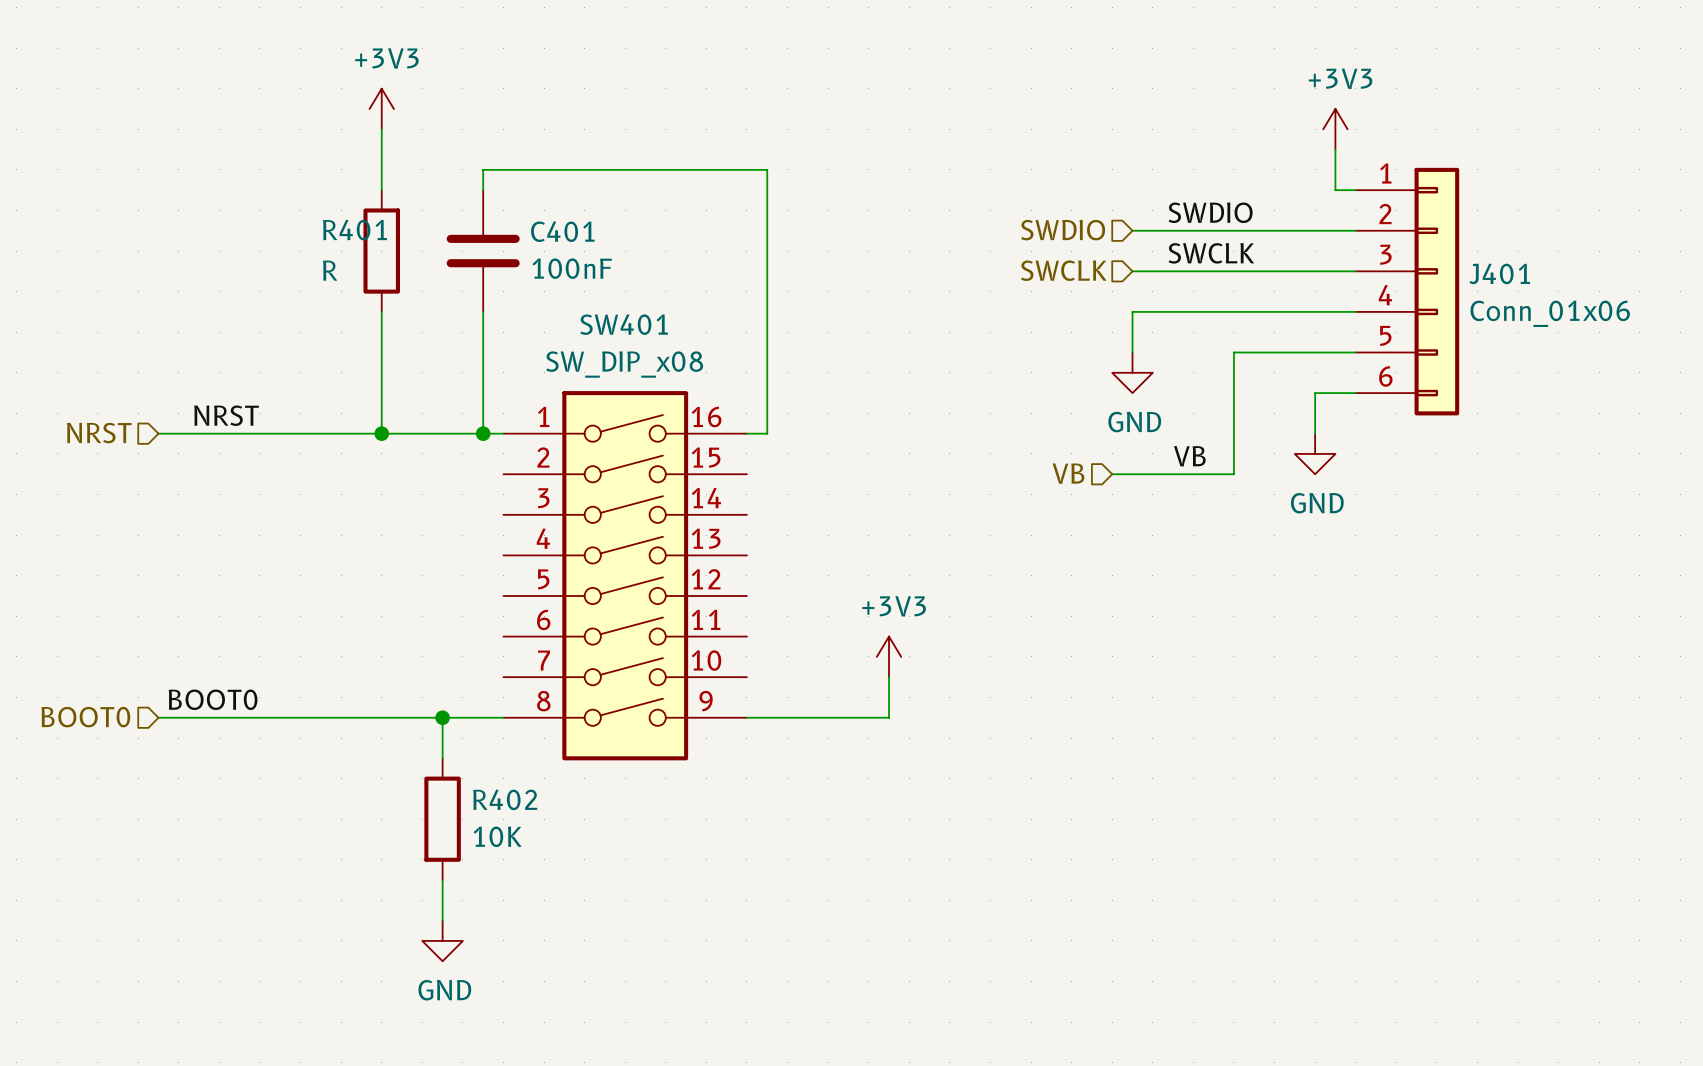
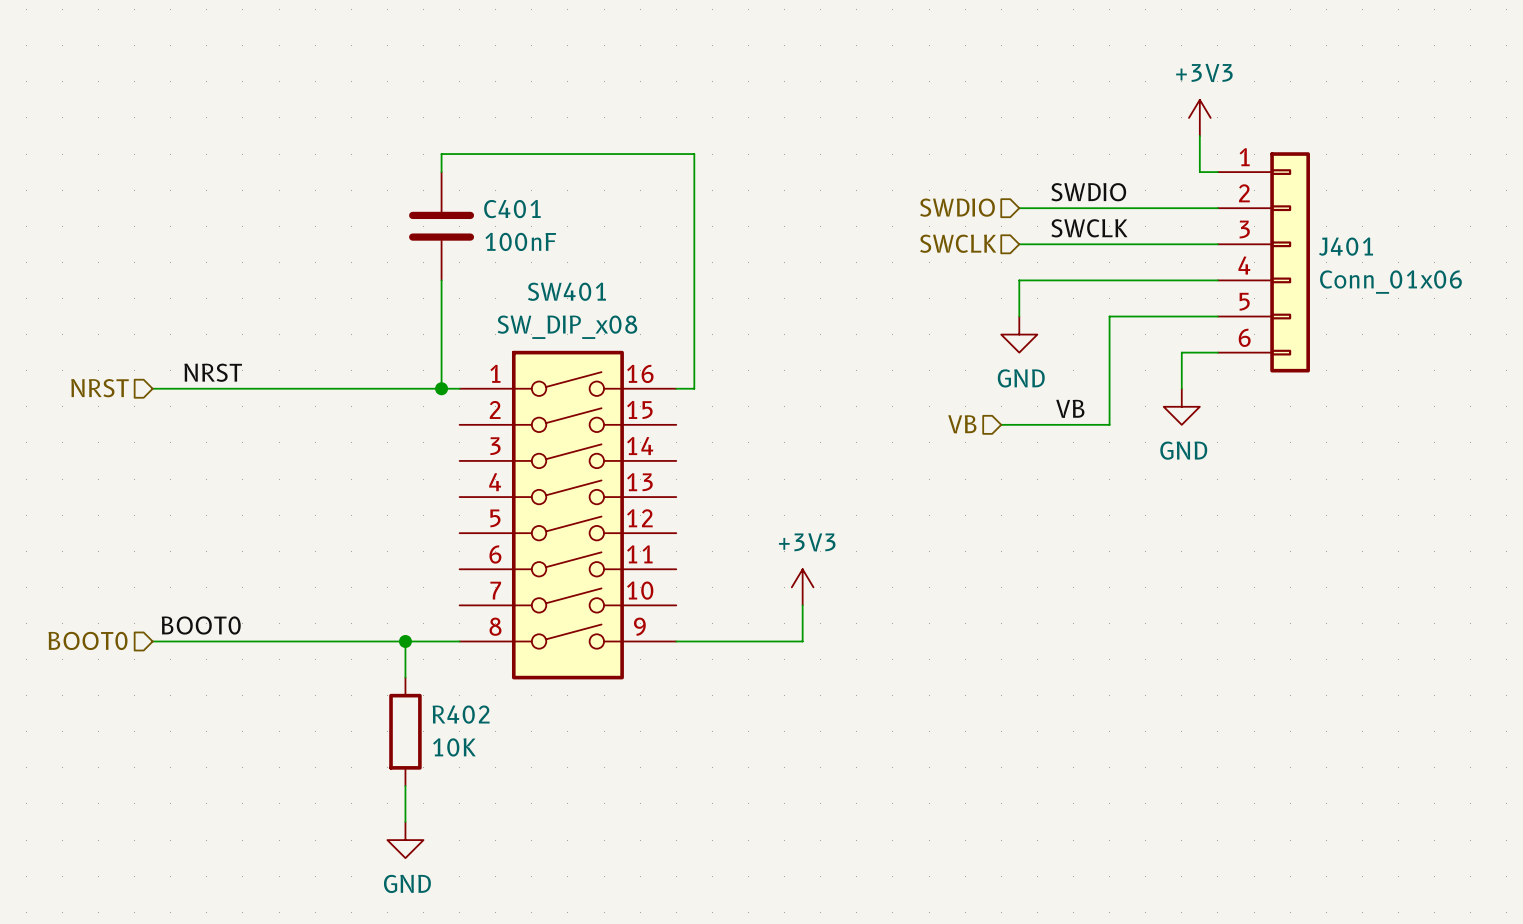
power symbol: +3V3 (381, 109) -> none
wire: (381, 129) (381, 190) -> none
R401: R (381, 251) -> none
wire: (381, 311) (381, 433) -> none
junction: (381, 433) -> none

